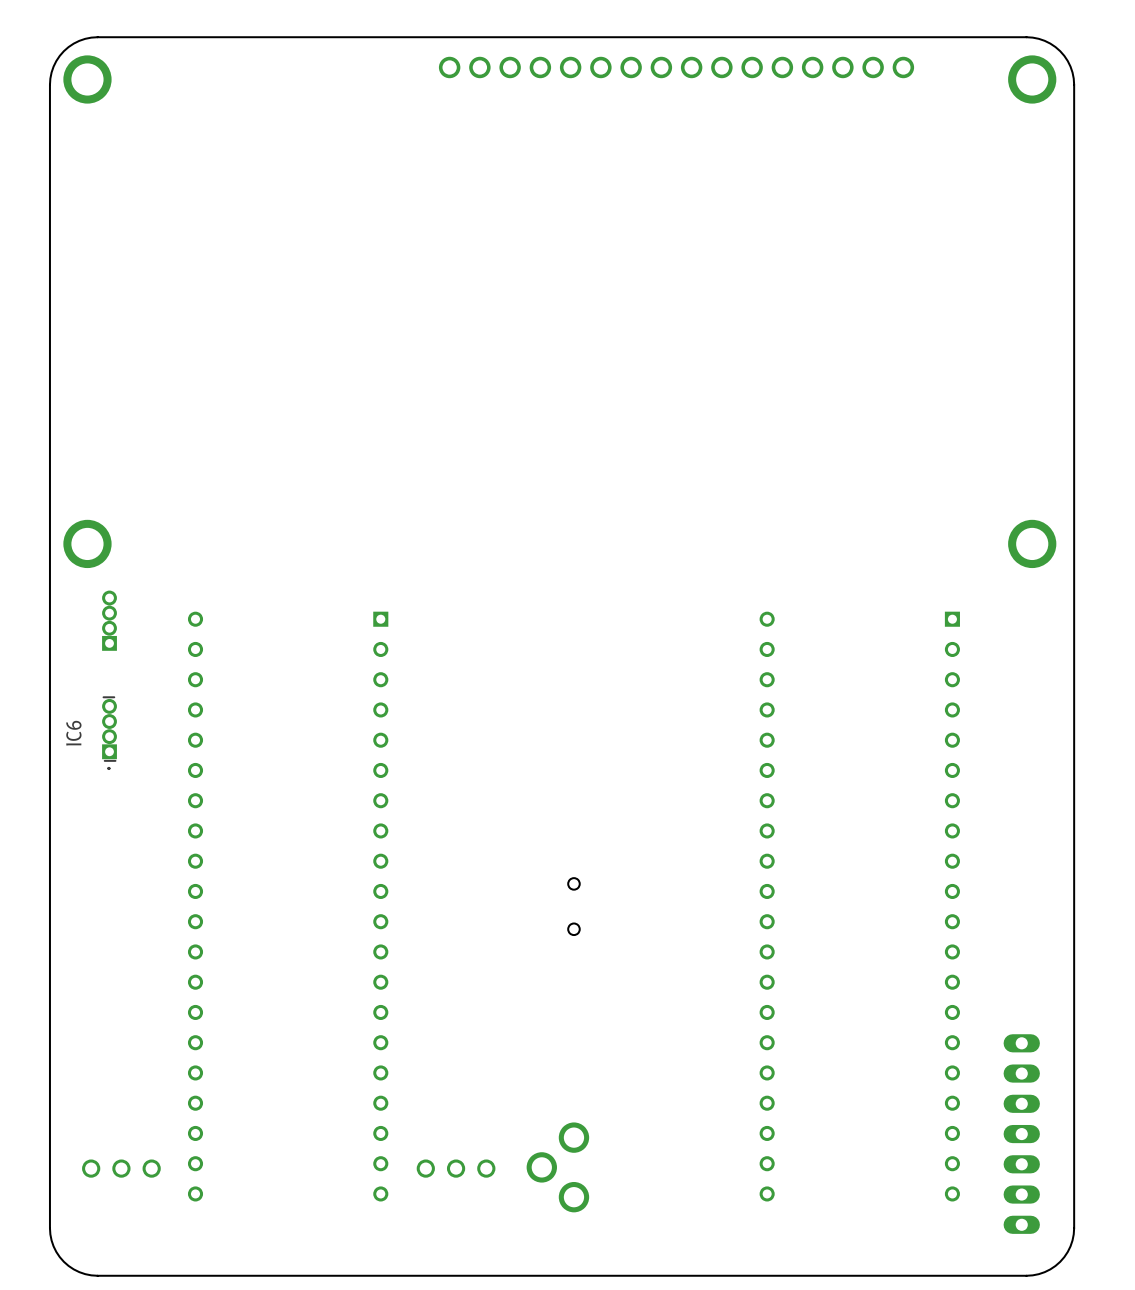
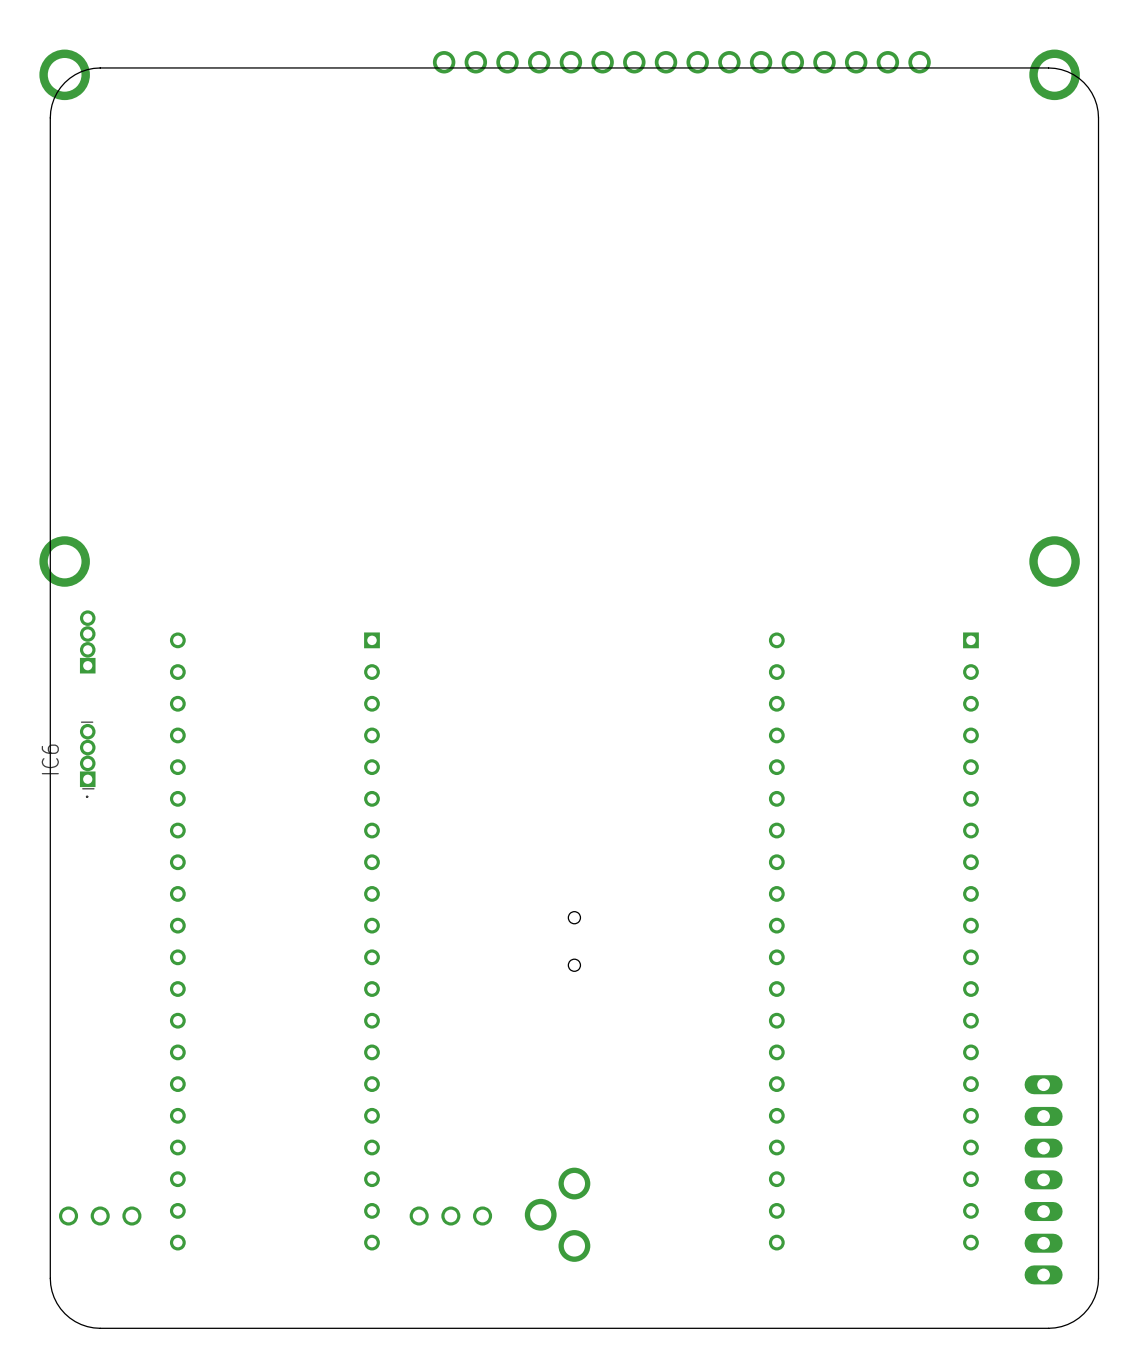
board edge: (1074, 120) (1073, 78) (1067, 61) (1060, 51) (1050, 43) (1038, 38) (1026, 37) (97, 37) (85, 38) (73, 43) (59, 55) (51, 72) (49, 84) (49, 1228) (51, 1240) (56, 1251) (63, 1261) (73, 1269) (91, 1275) (121, 1275) -> (1098, 117) (1094, 98) (1083, 82) (1067, 71) (1048, 67) (100, 67) (87, 69) (75, 74) (60, 87) (52, 104) (50, 117) (50, 1278) (54, 1297) (64, 1313) (81, 1324) (100, 1328)

